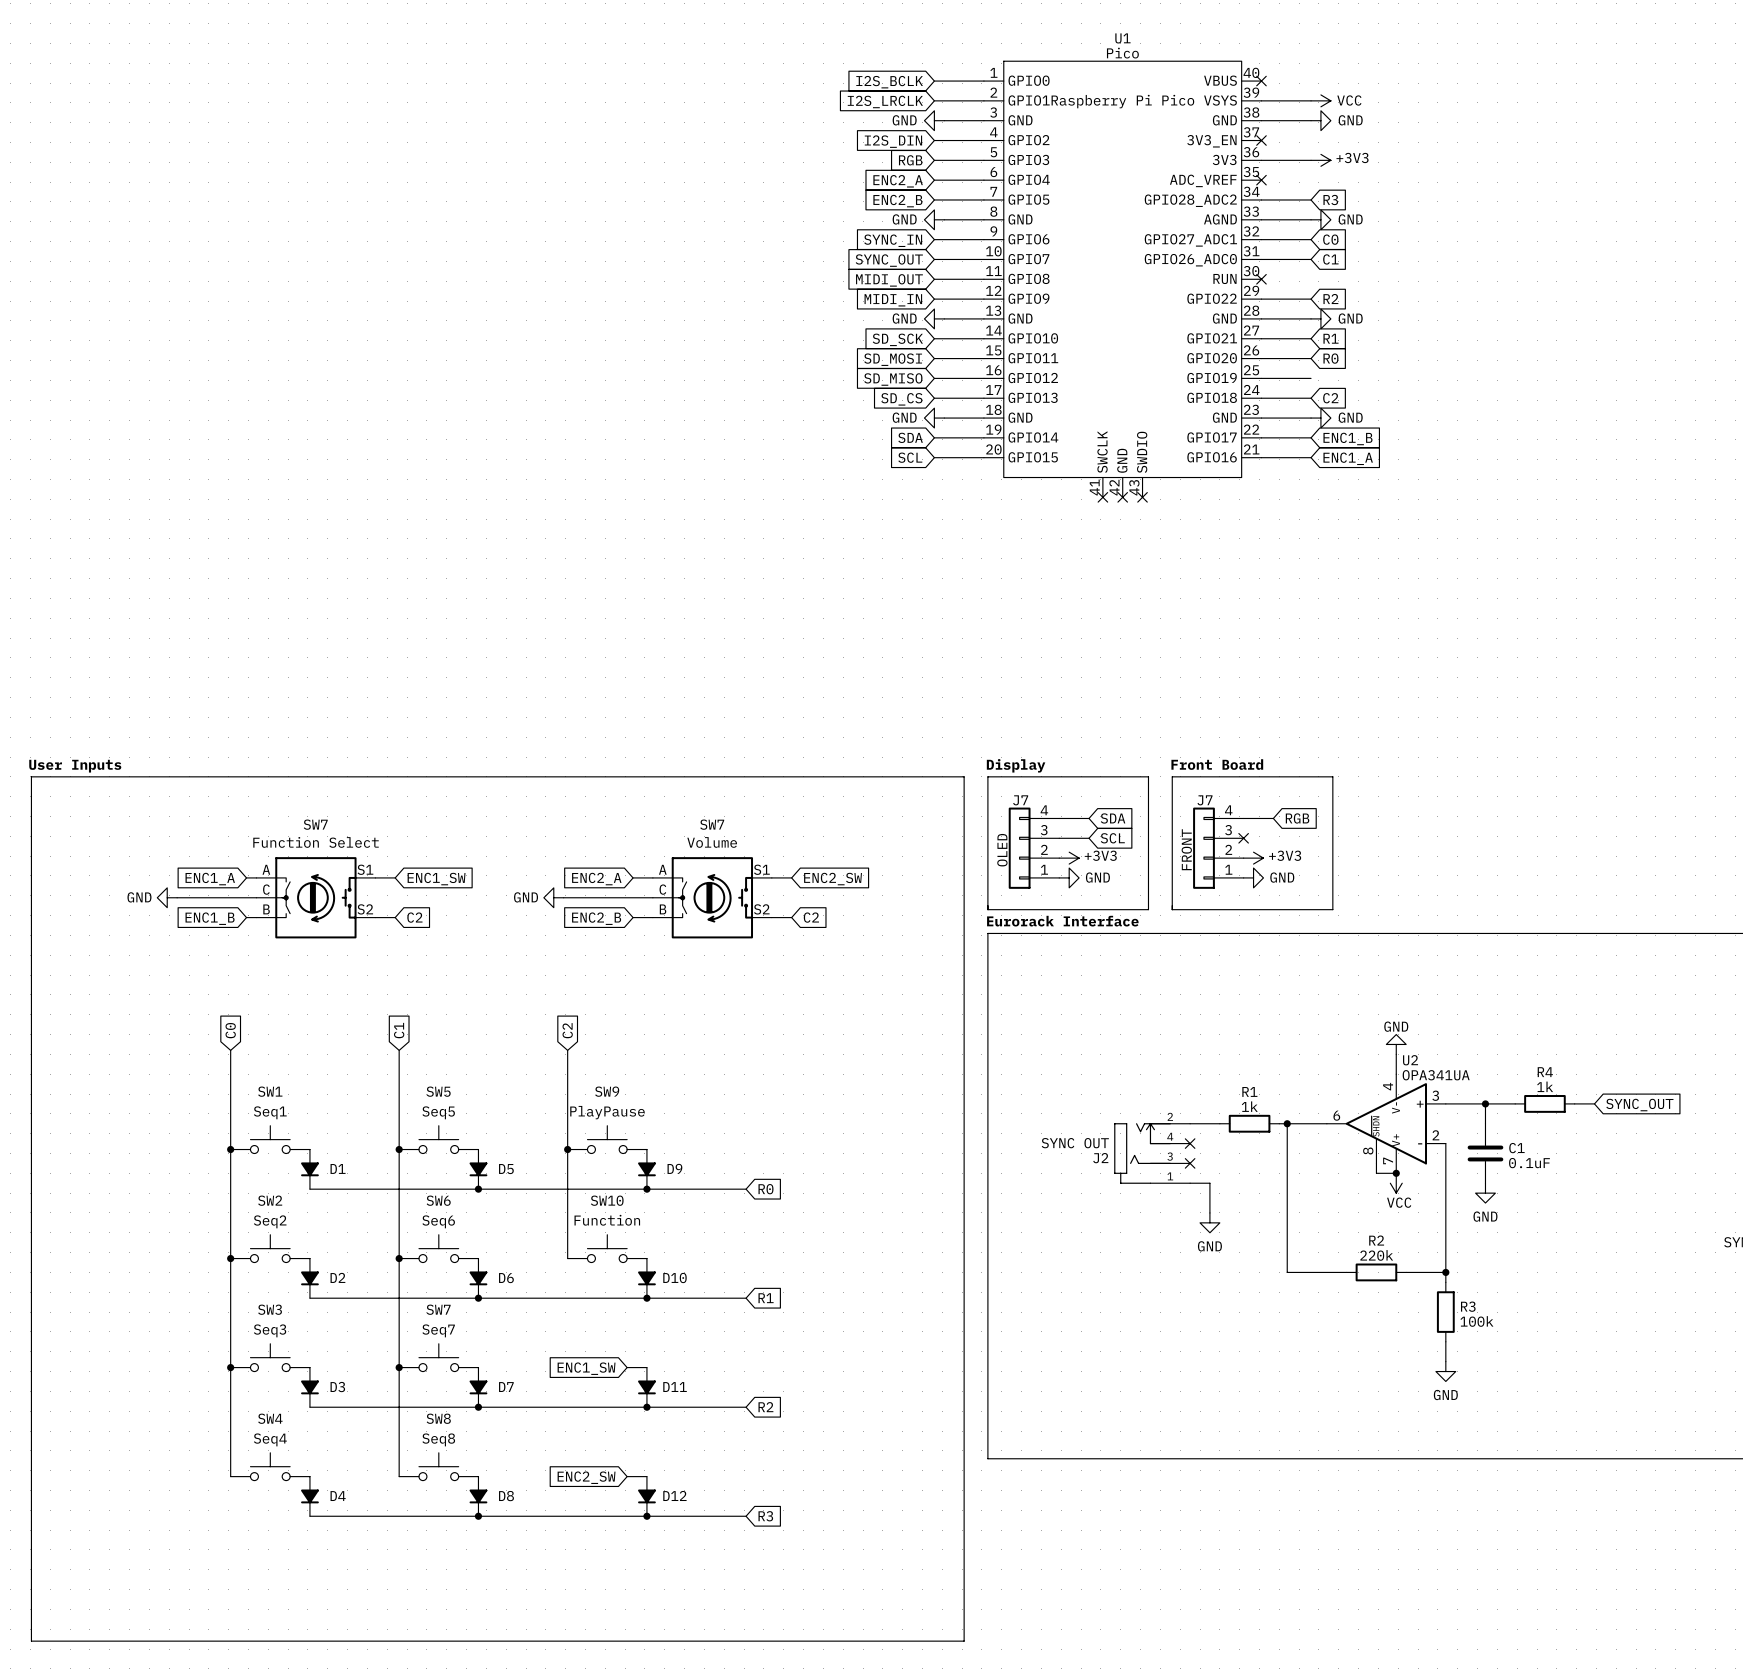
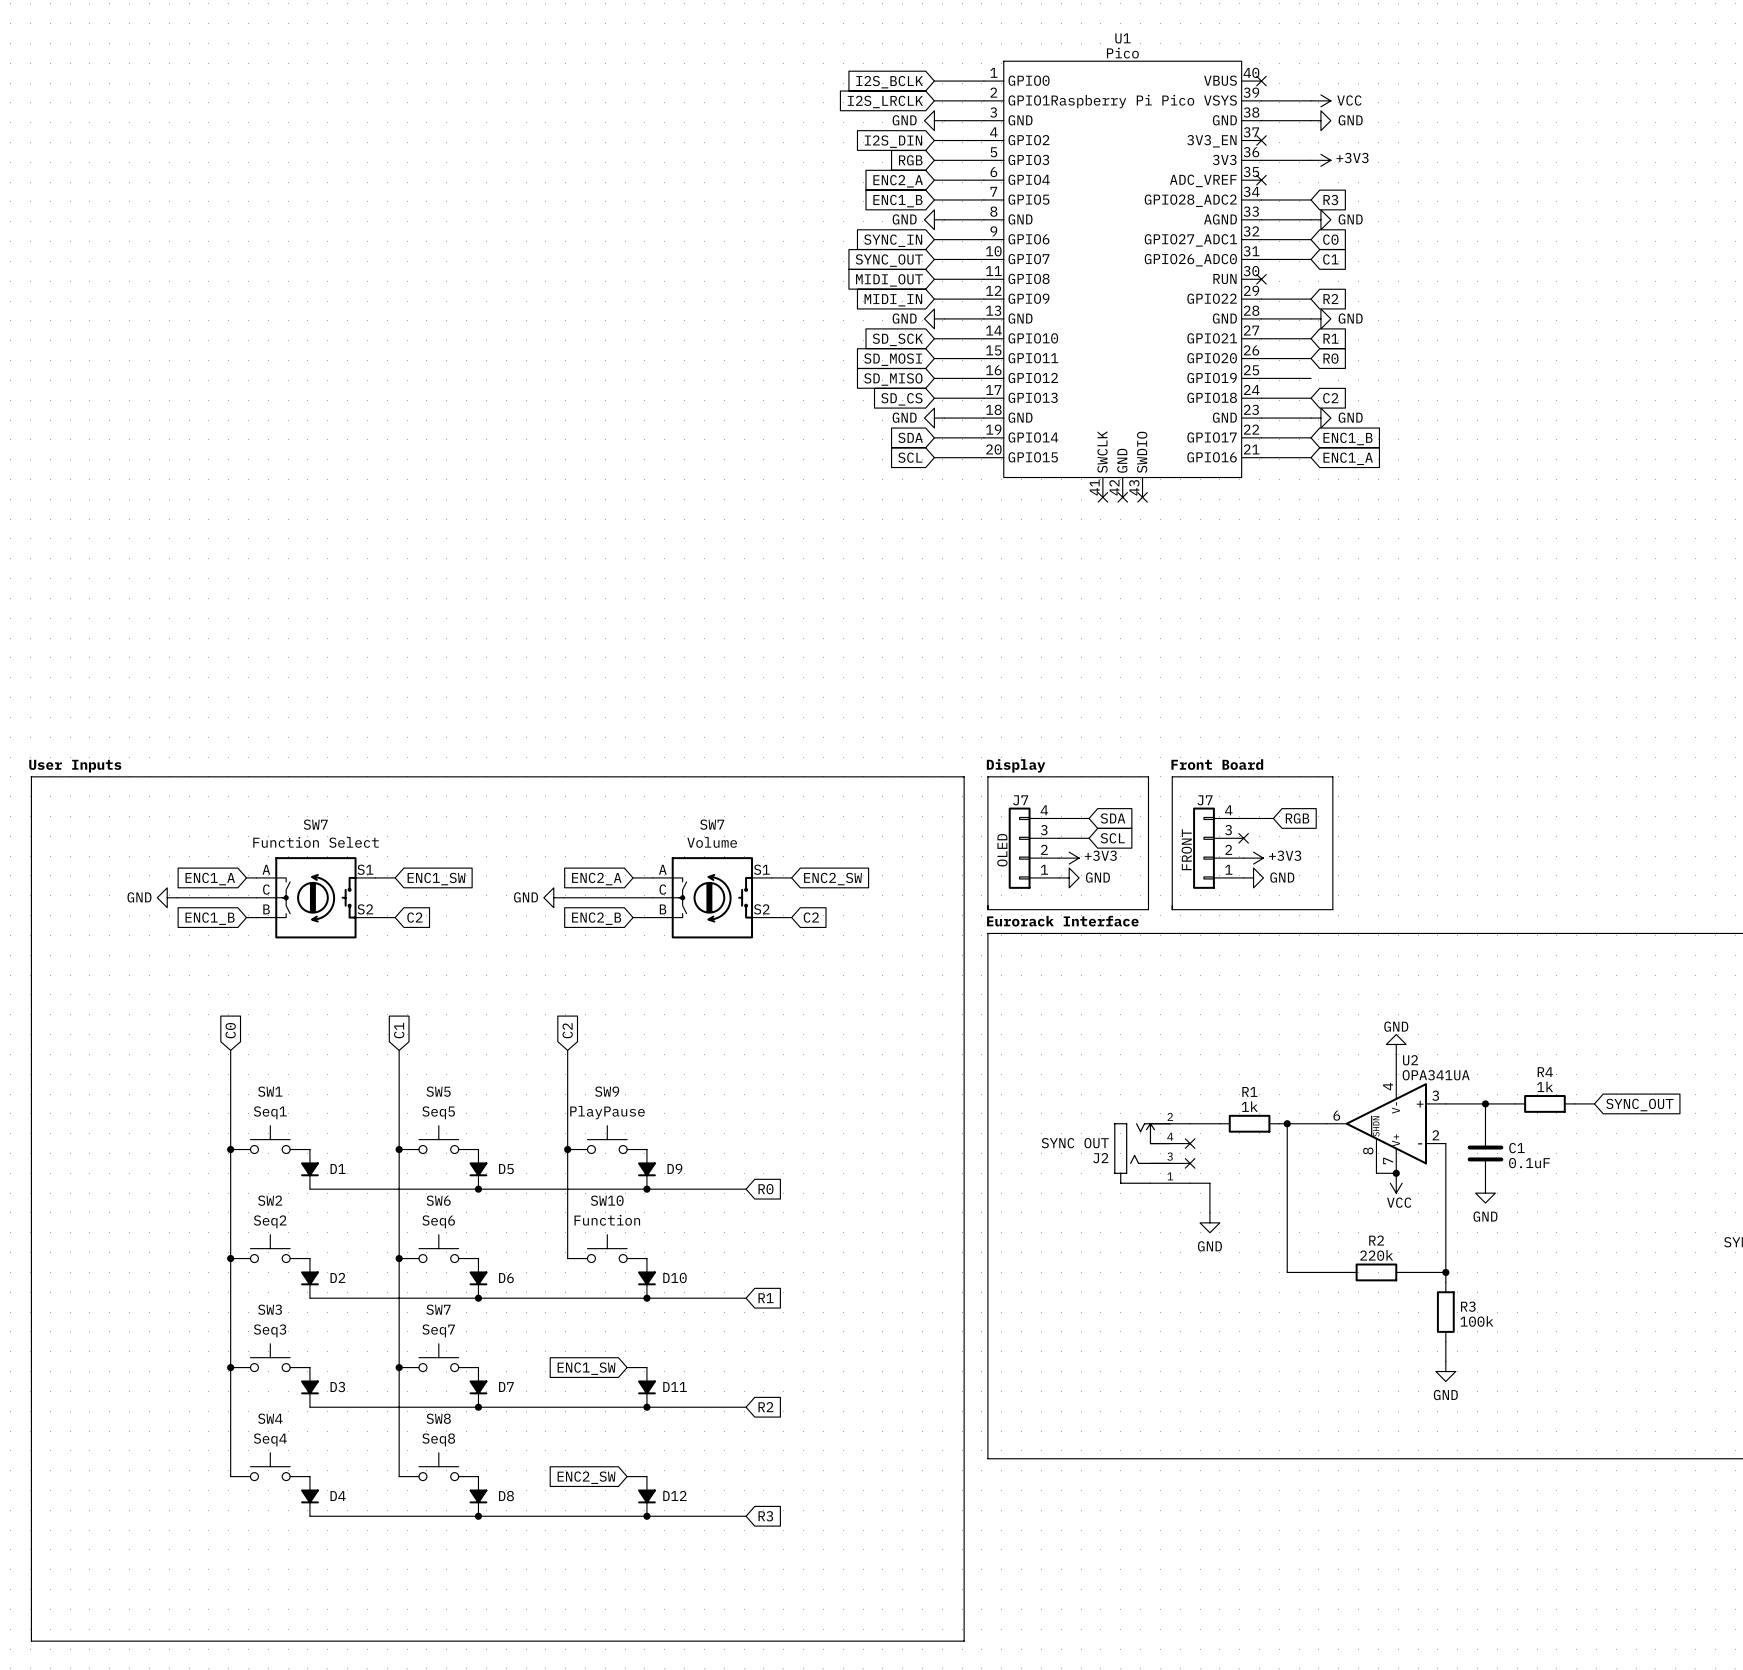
global label: ENC2_B (897, 201) -> ENC1_B (897, 201)

